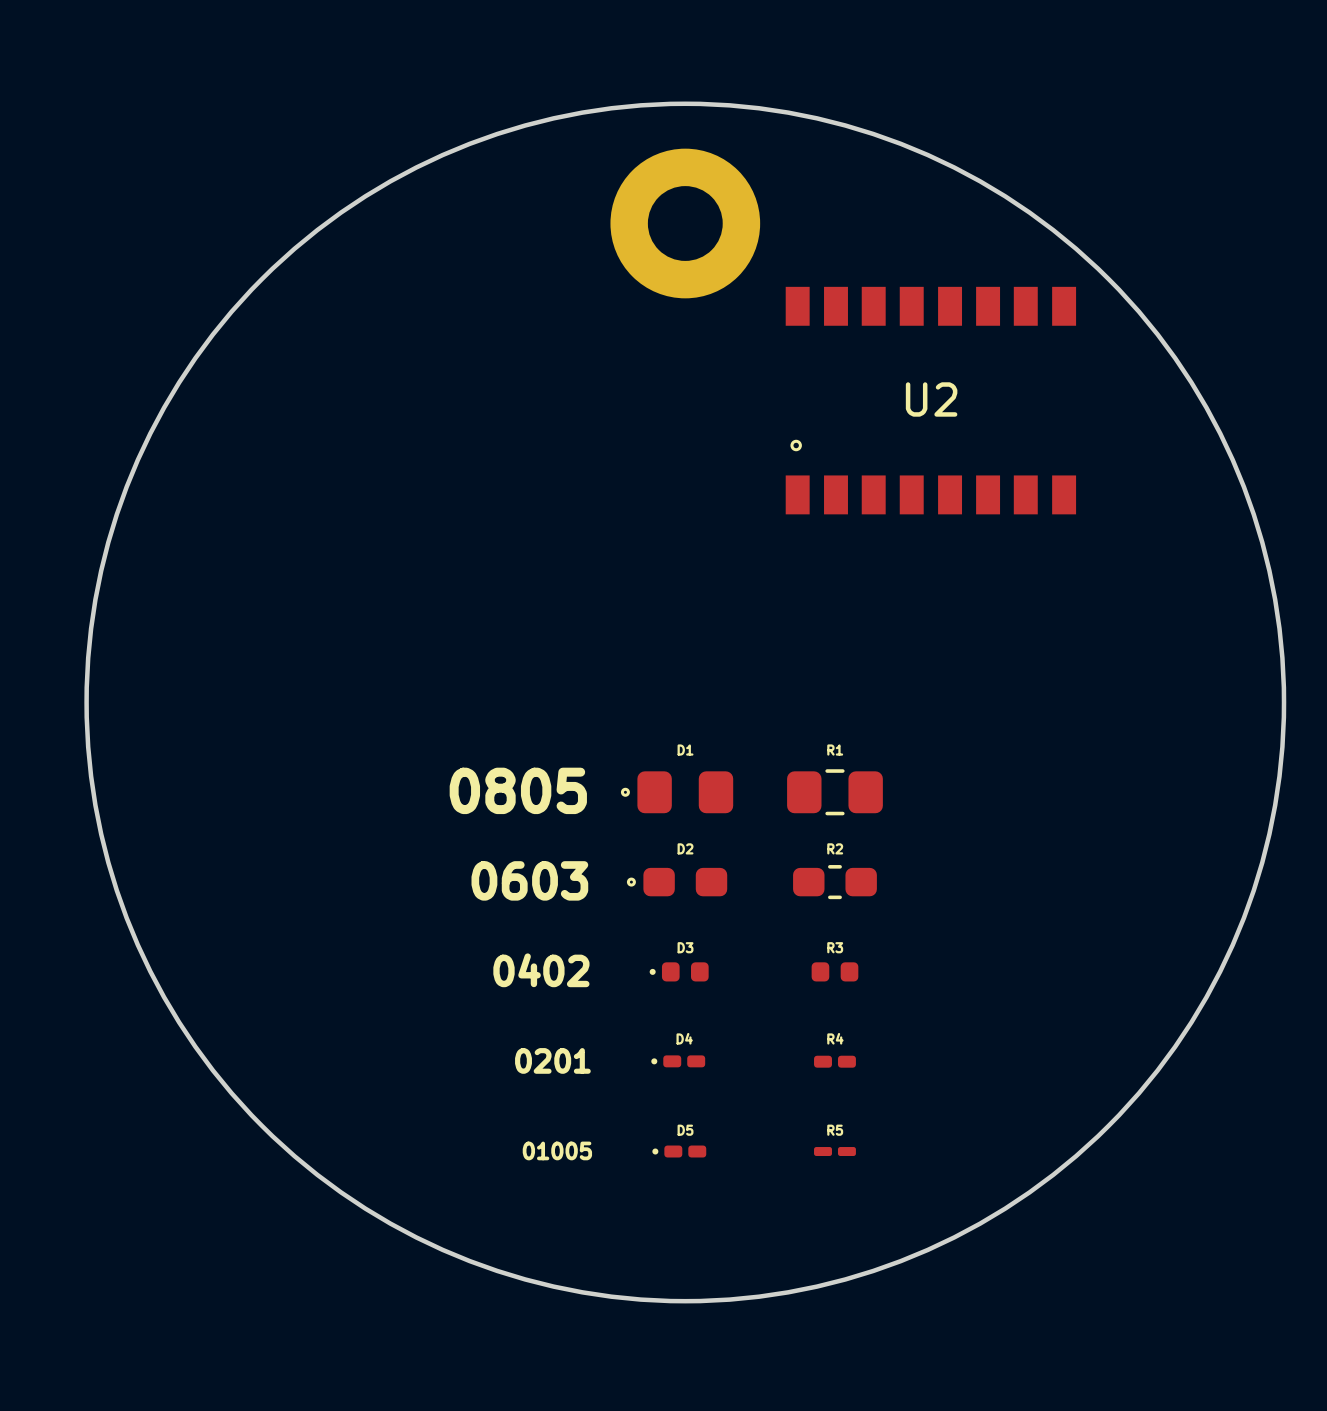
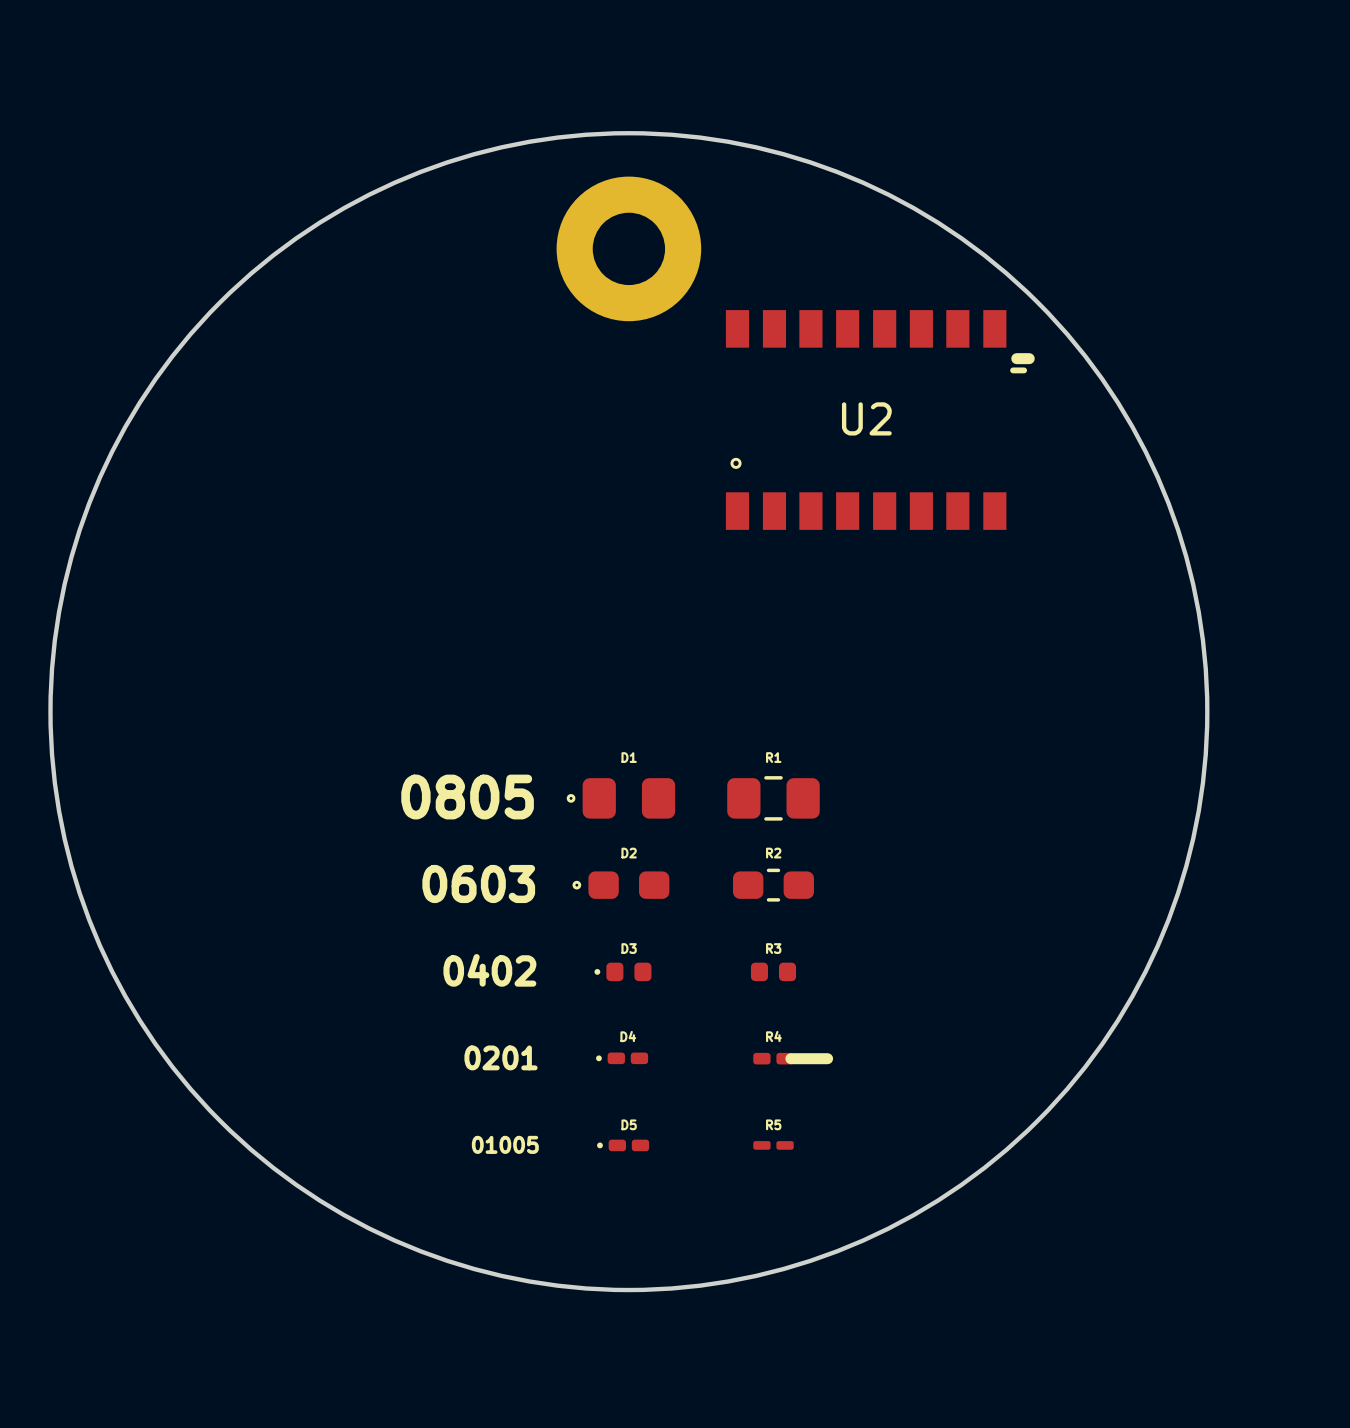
line: none -> (1016, 358) (1029, 358)
line: none -> (1013, 370) (1024, 370)
line: none -> (790, 1058) (827, 1058)

